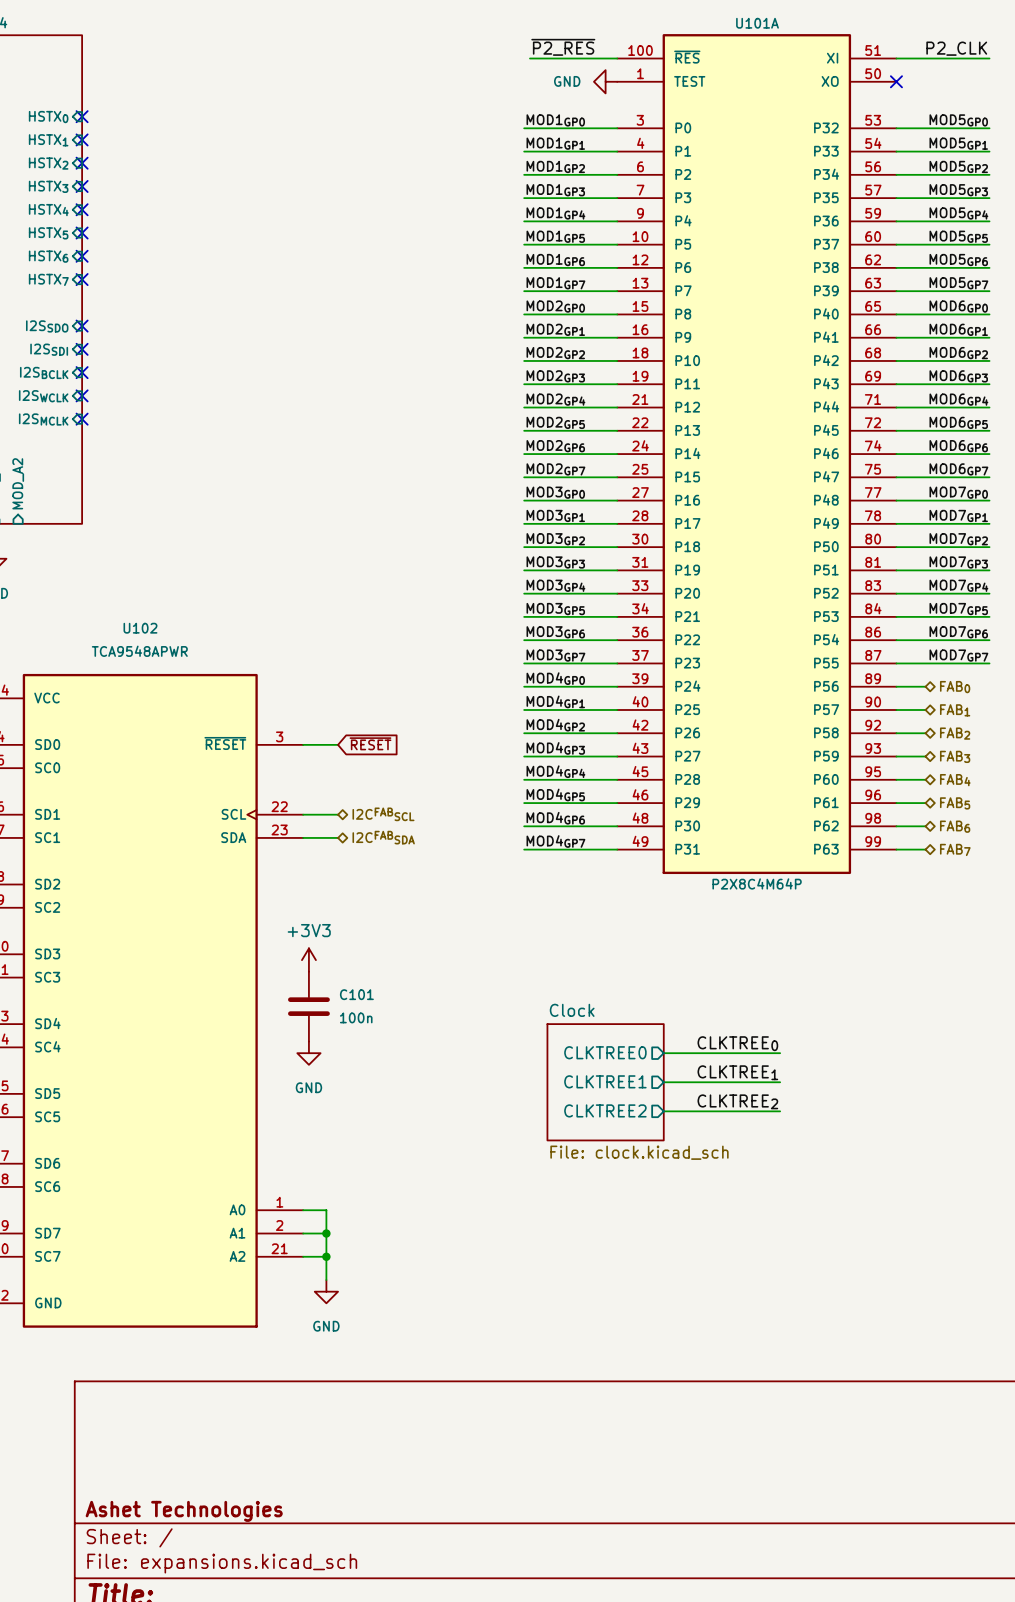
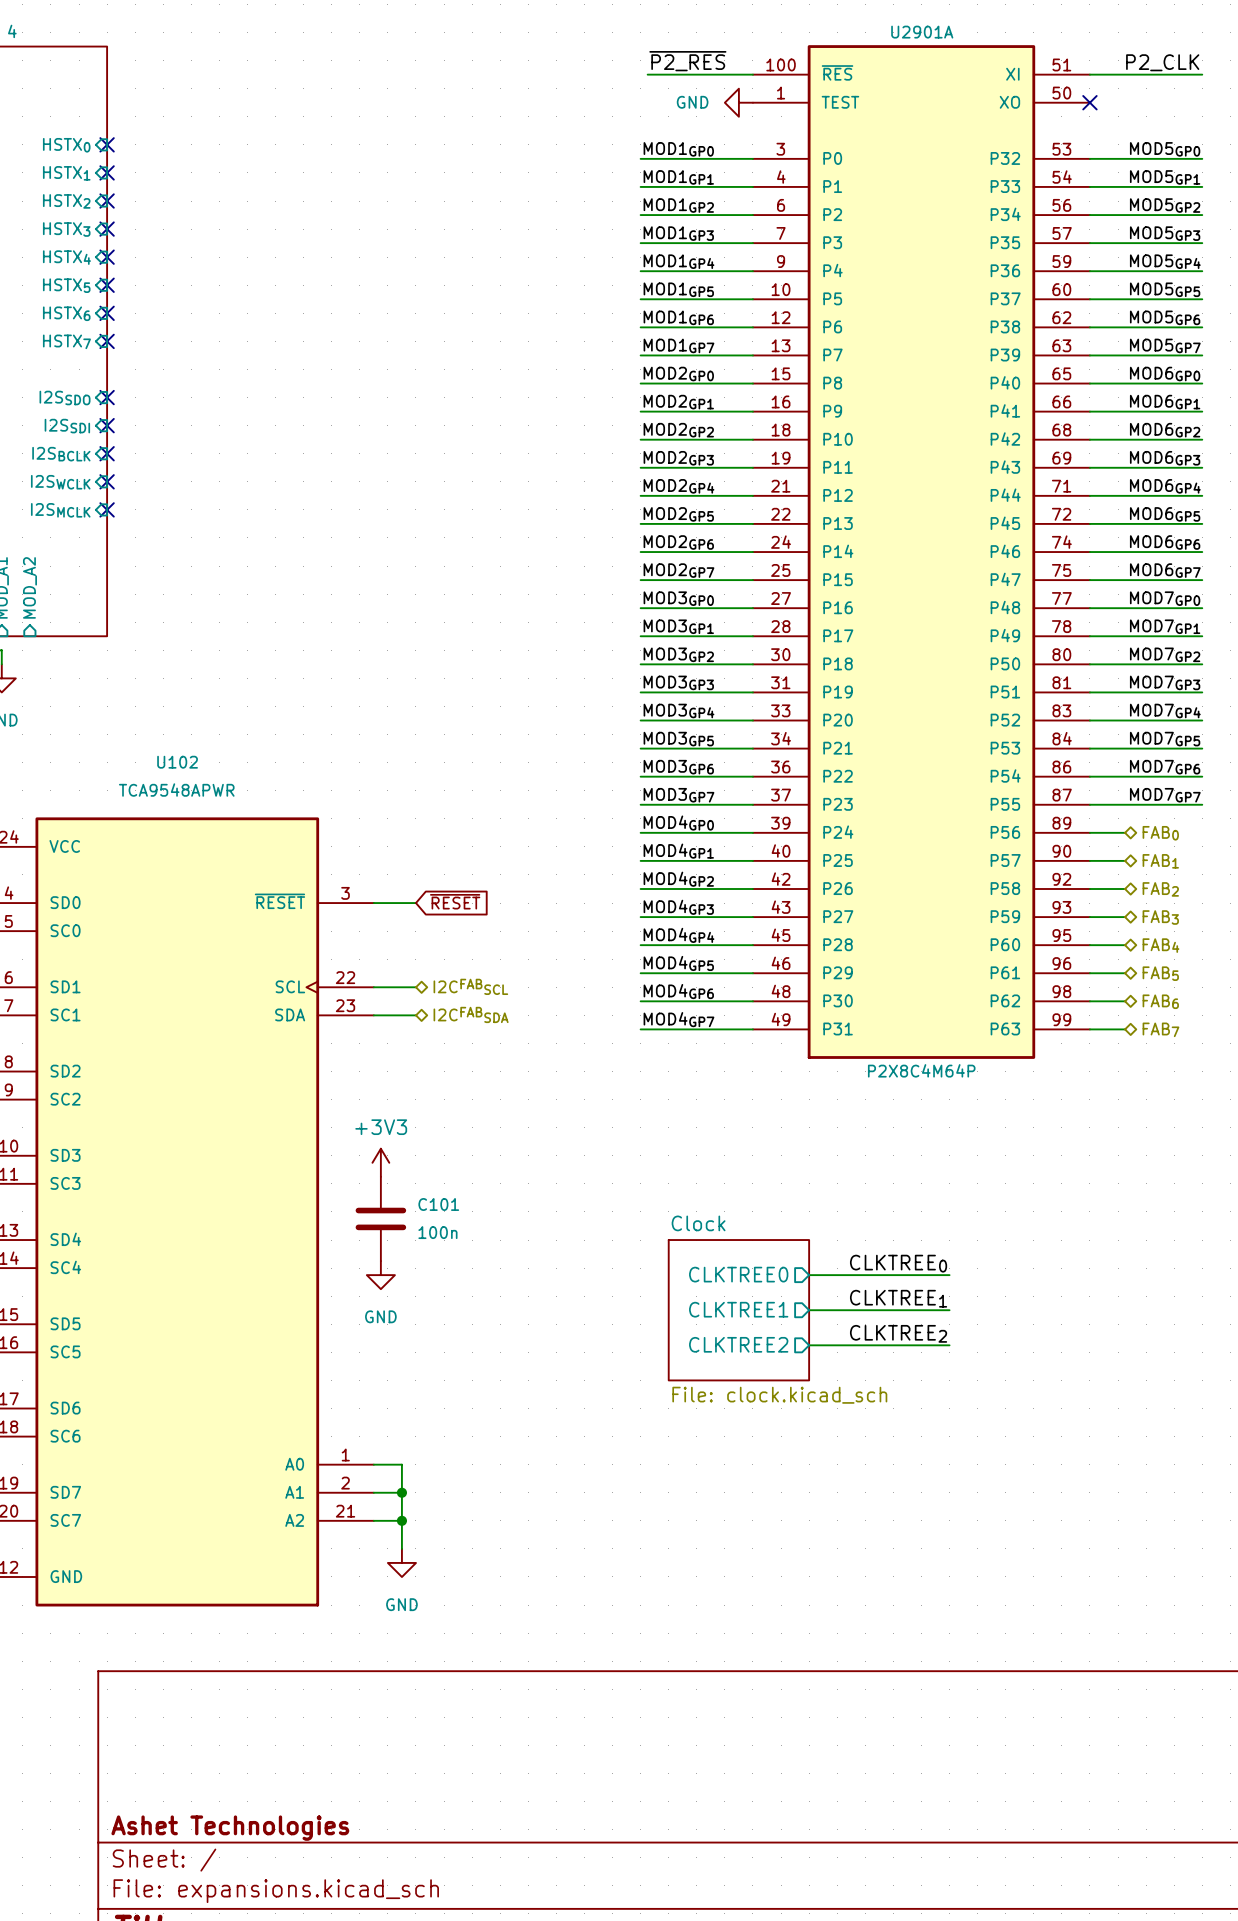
U101A name: U101A (757, 23) -> U2901A (922, 32)

